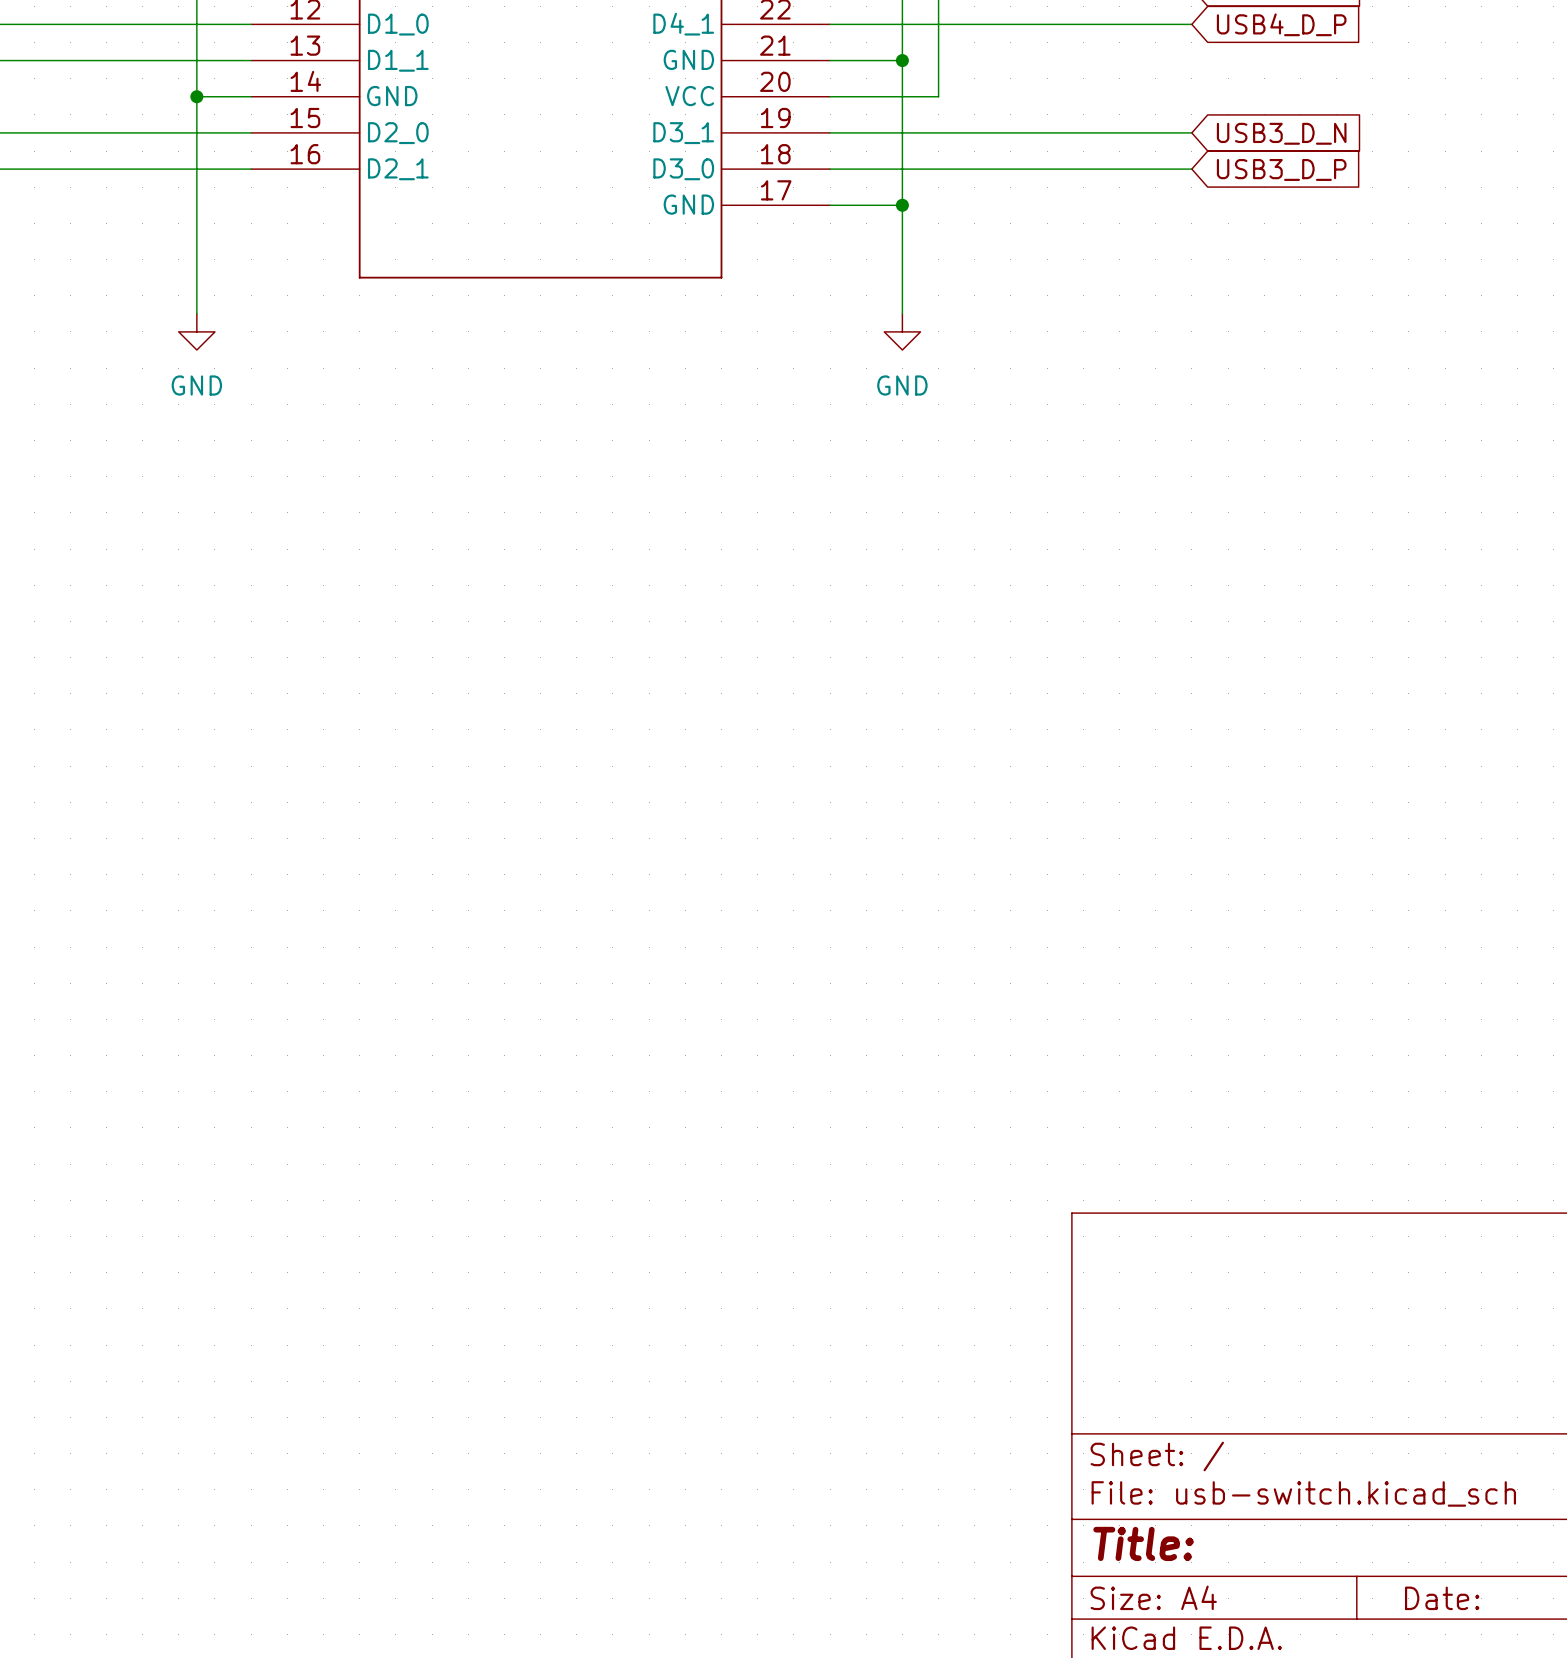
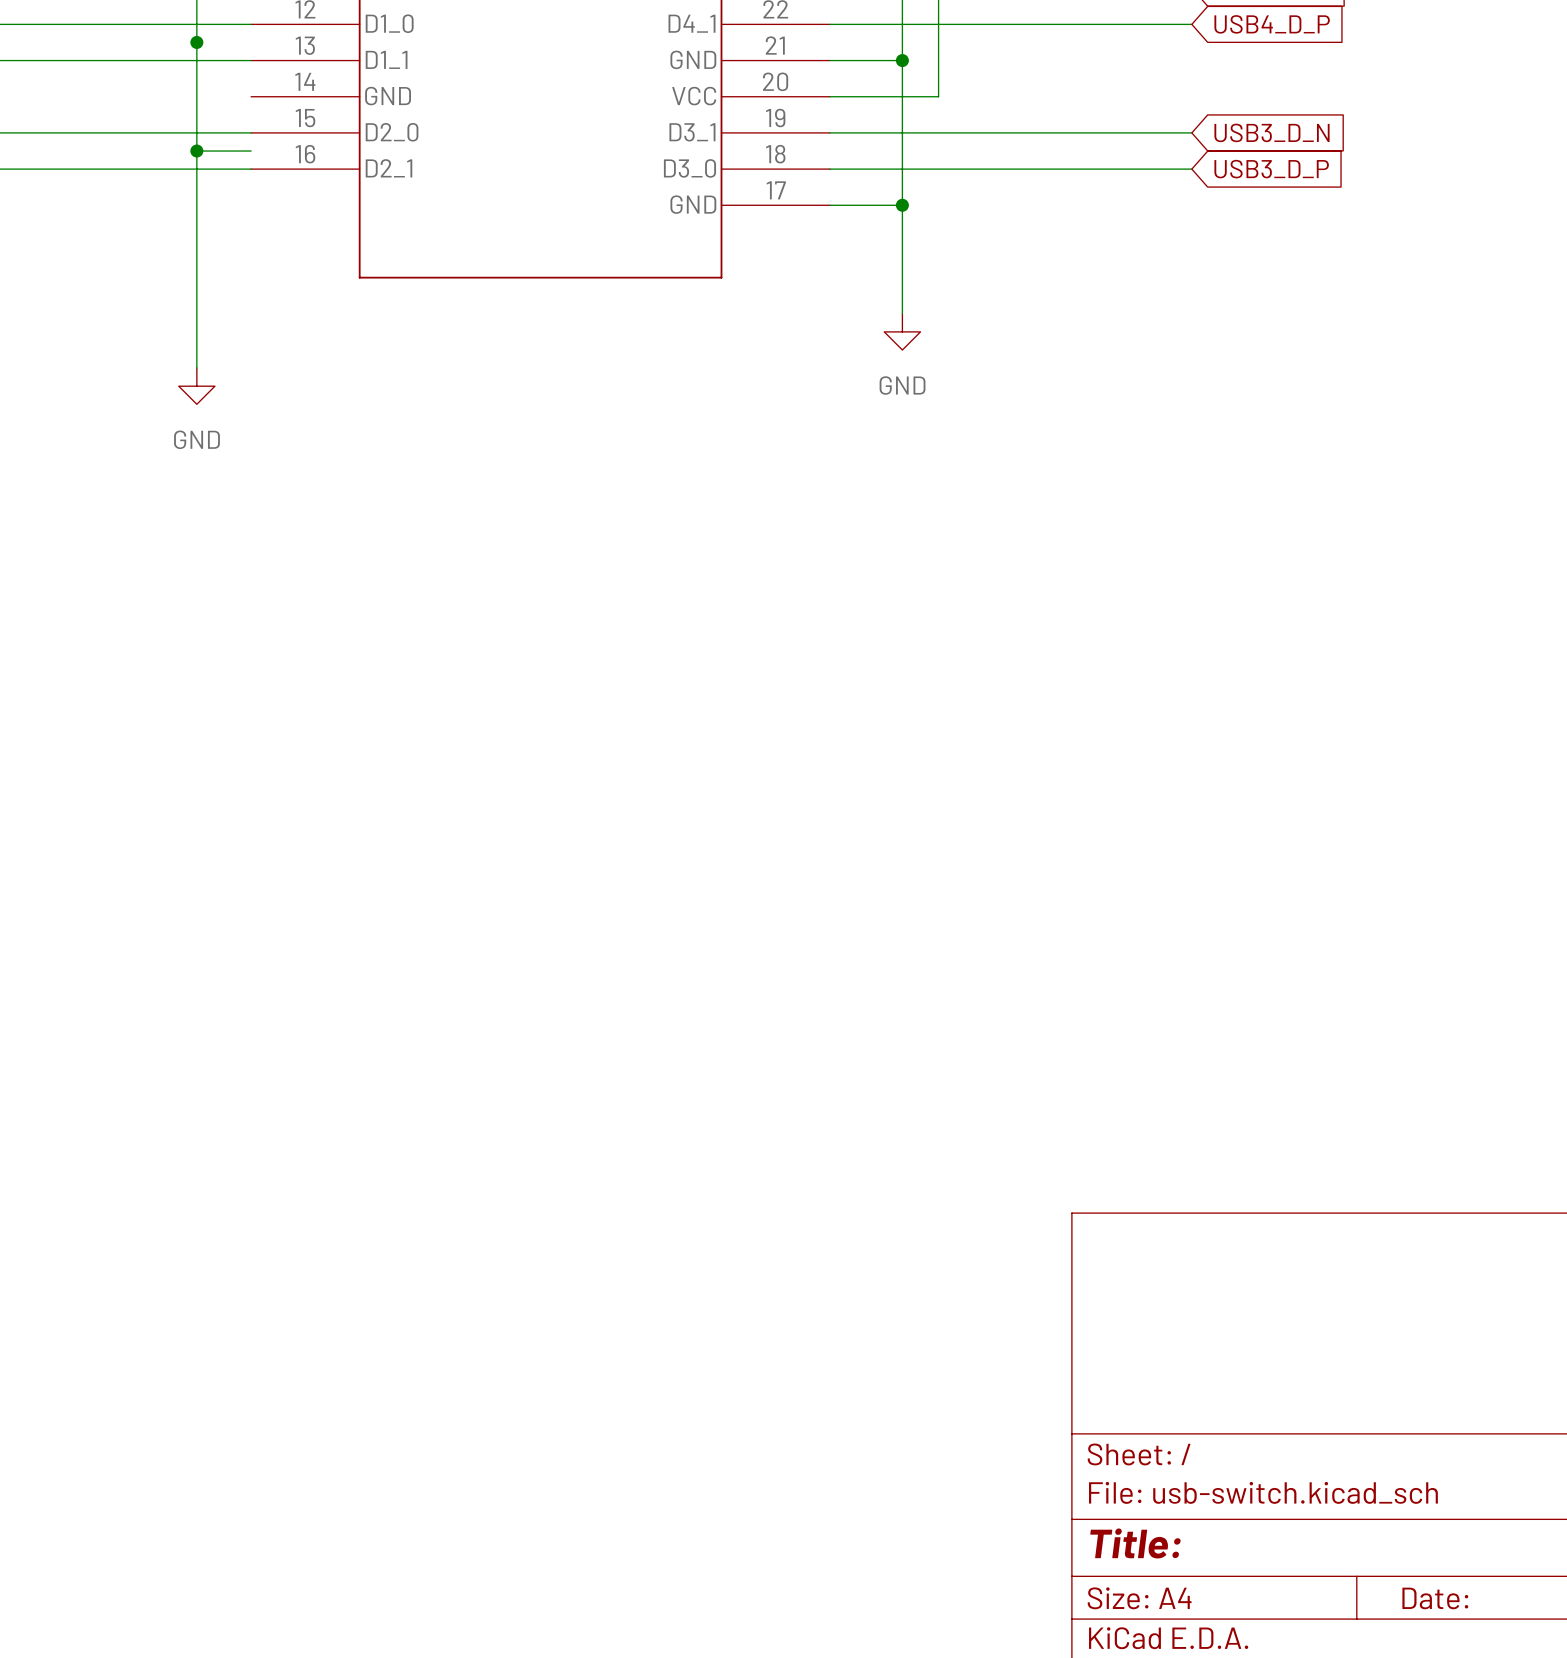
junction: none -> (196, 42)
wire: (196, 96) (251, 96) -> (196, 151) (251, 151)
junction: (196, 96) -> none
junction: none -> (196, 151)
wire: none -> (196, 313) (196, 368)
power symbol position: GND (196, 331) -> GND (196, 386)

